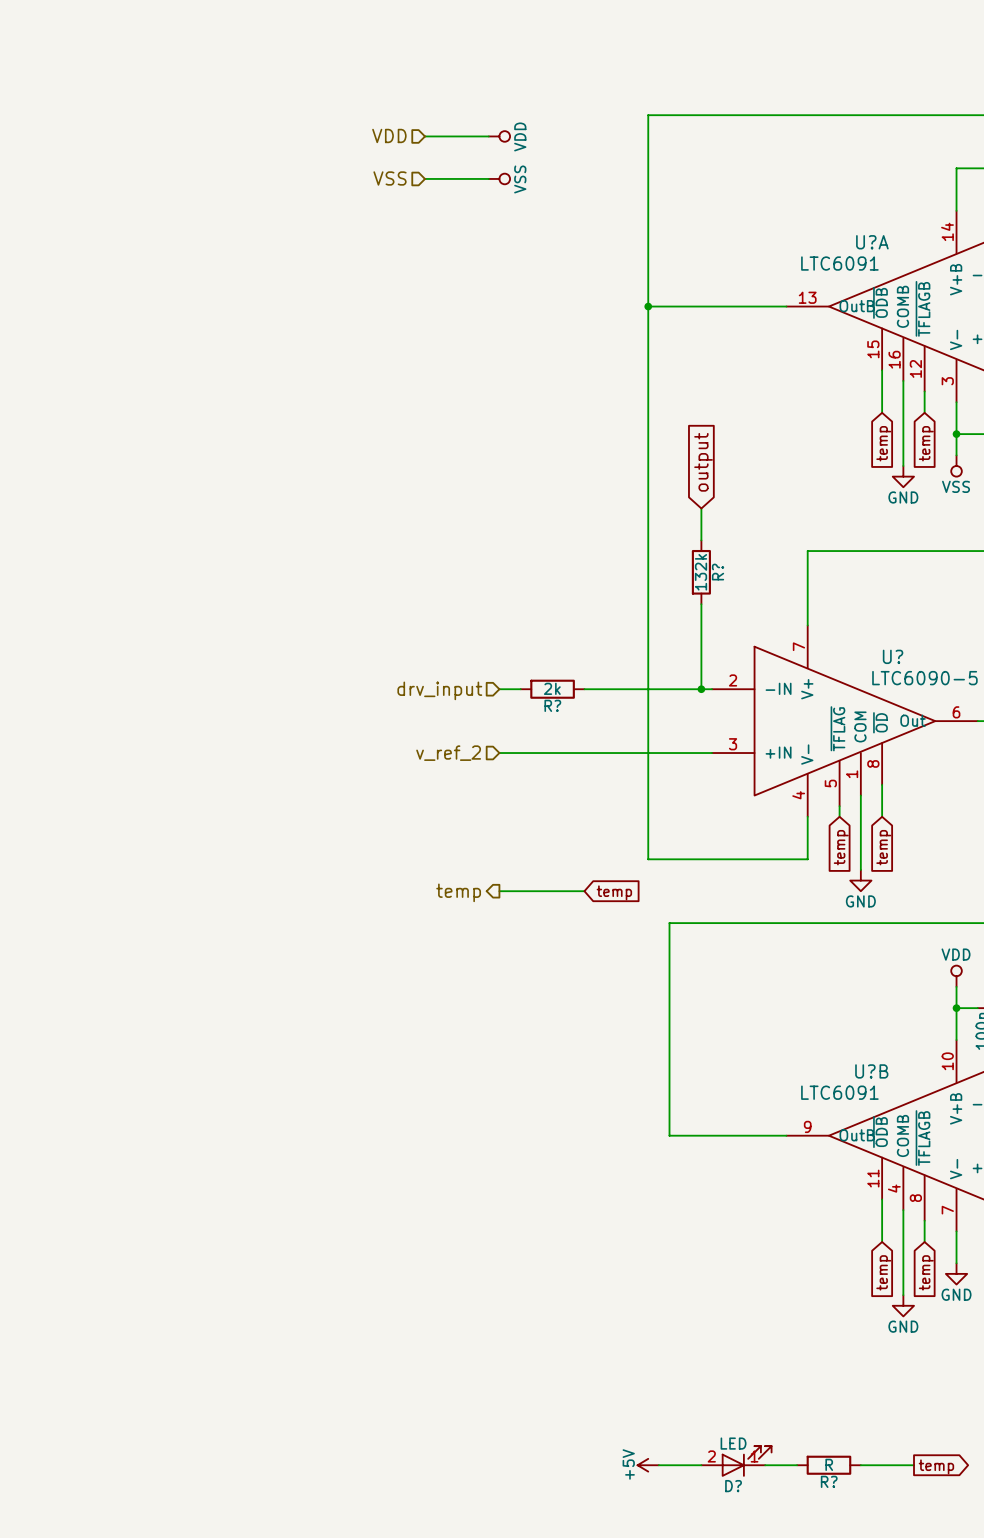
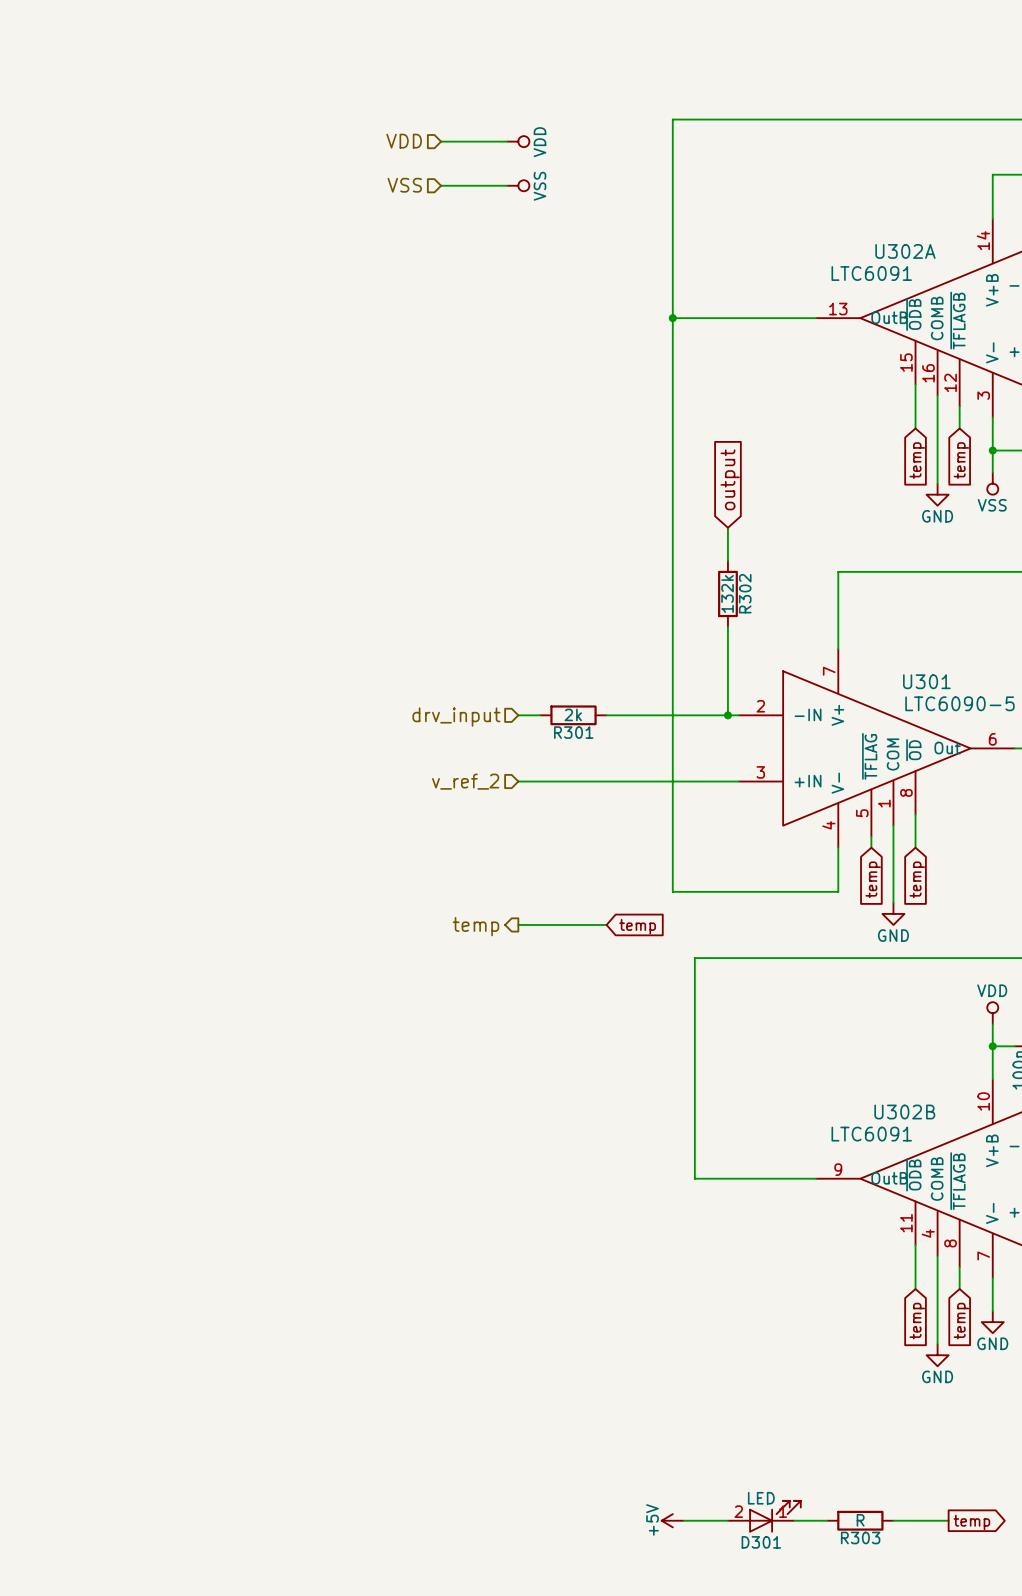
U?A name: U?A (872, 242) -> U302A (905, 251)
R? name: R? (718, 572) -> R302 (745, 593)
U? name: U? (893, 656) -> U301 (926, 681)
R? name: R? (552, 705) -> R301 (573, 732)
U?B name: U?B (871, 1071) -> U302B (904, 1112)
R? name: R? (829, 1481) -> R303 (860, 1537)
D? name: D? (733, 1486) -> D301 (761, 1542)

